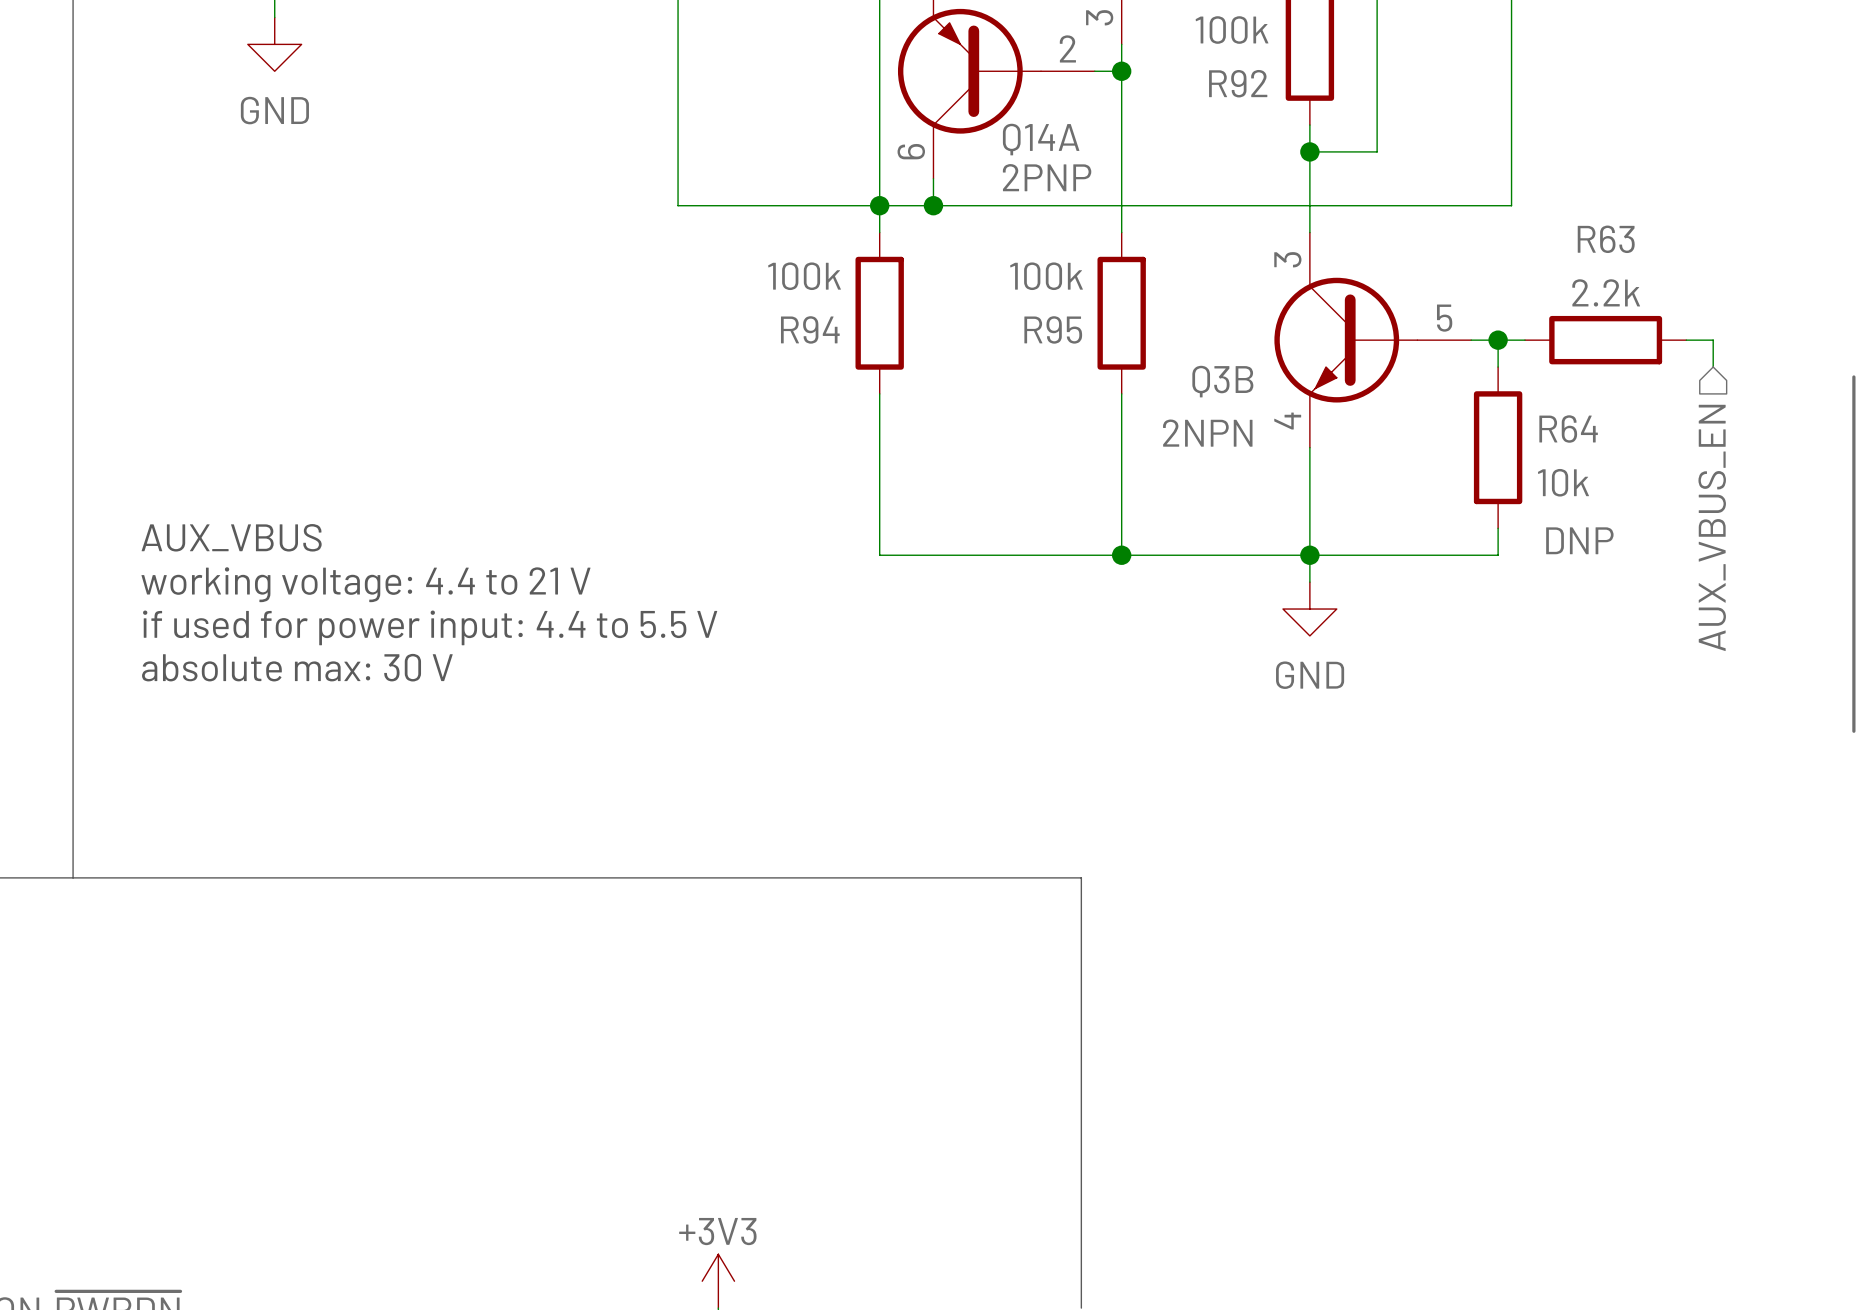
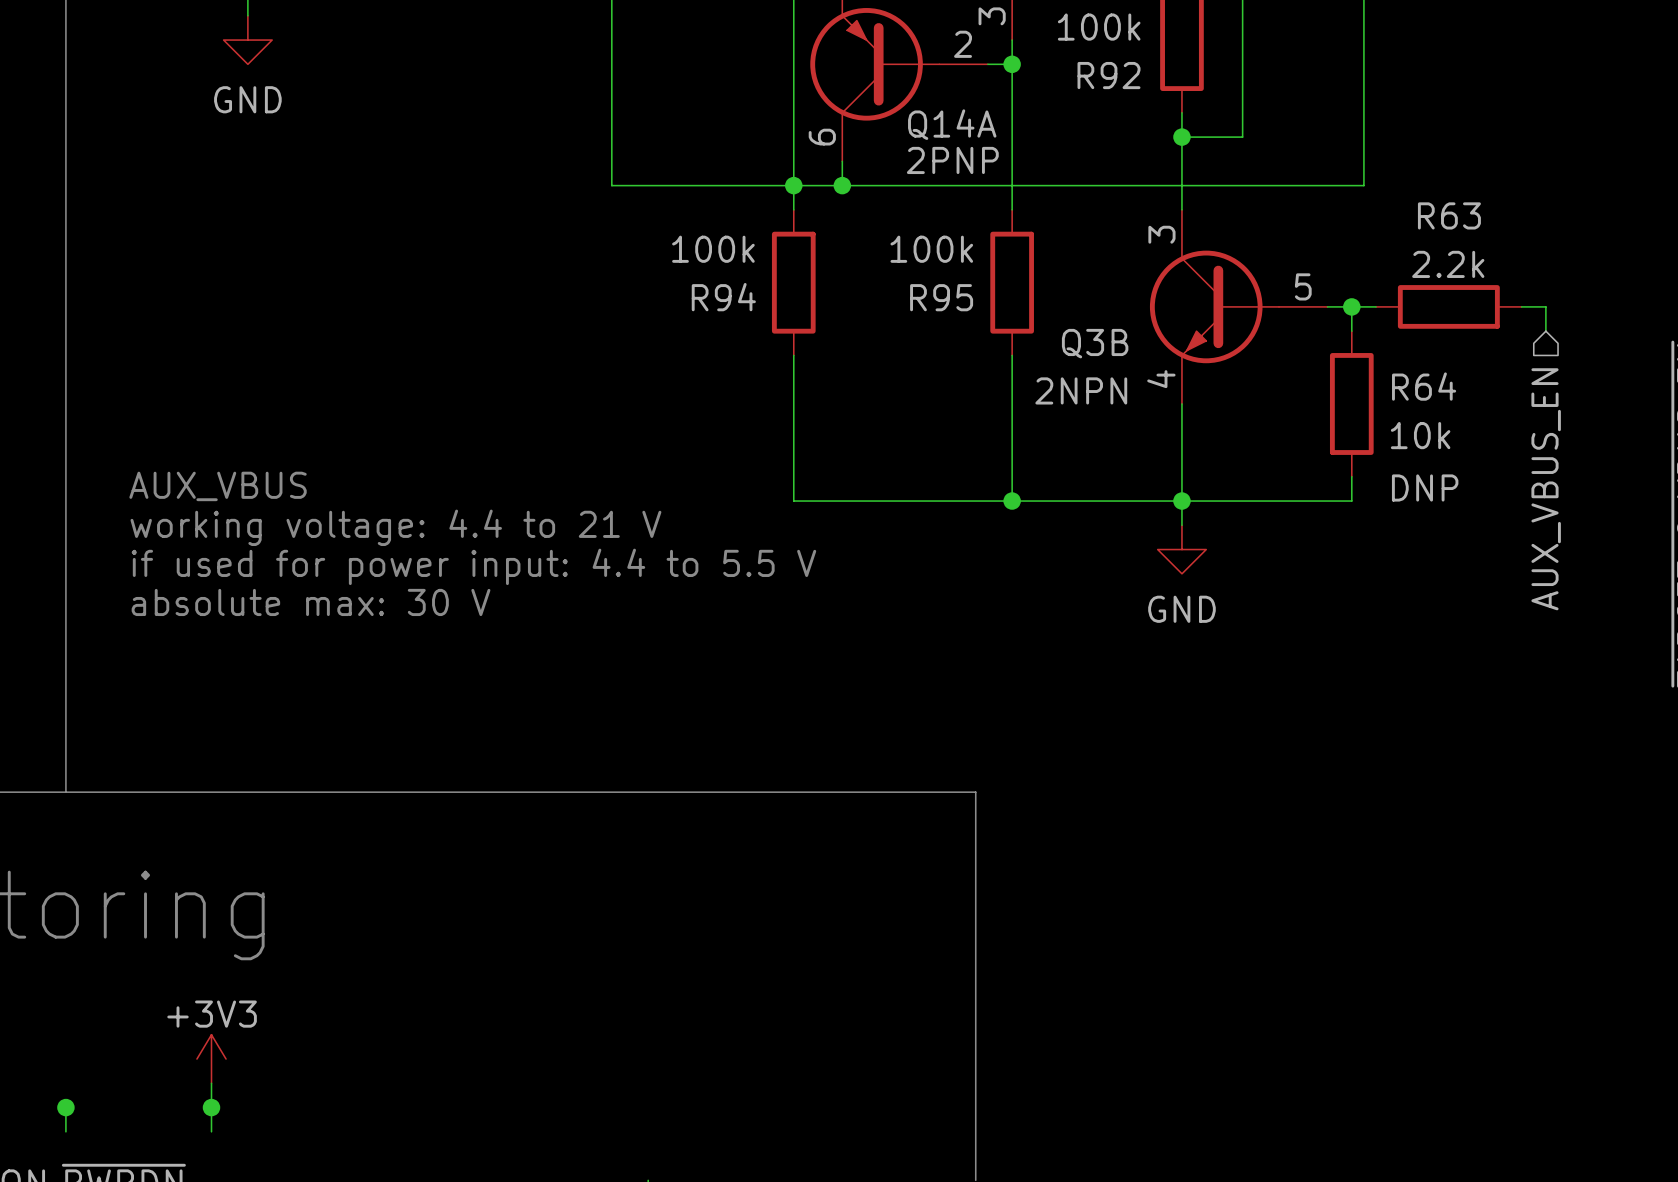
power symbol: none -> +3V3 (211, 1059)
wire: none -> (211, 1083) (211, 1131)
wire: none -> (65, 1107) (65, 1131)
junction: none -> (65, 1107)
junction: none -> (211, 1107)
power symbol: +3V3 (718, 1281) -> none

